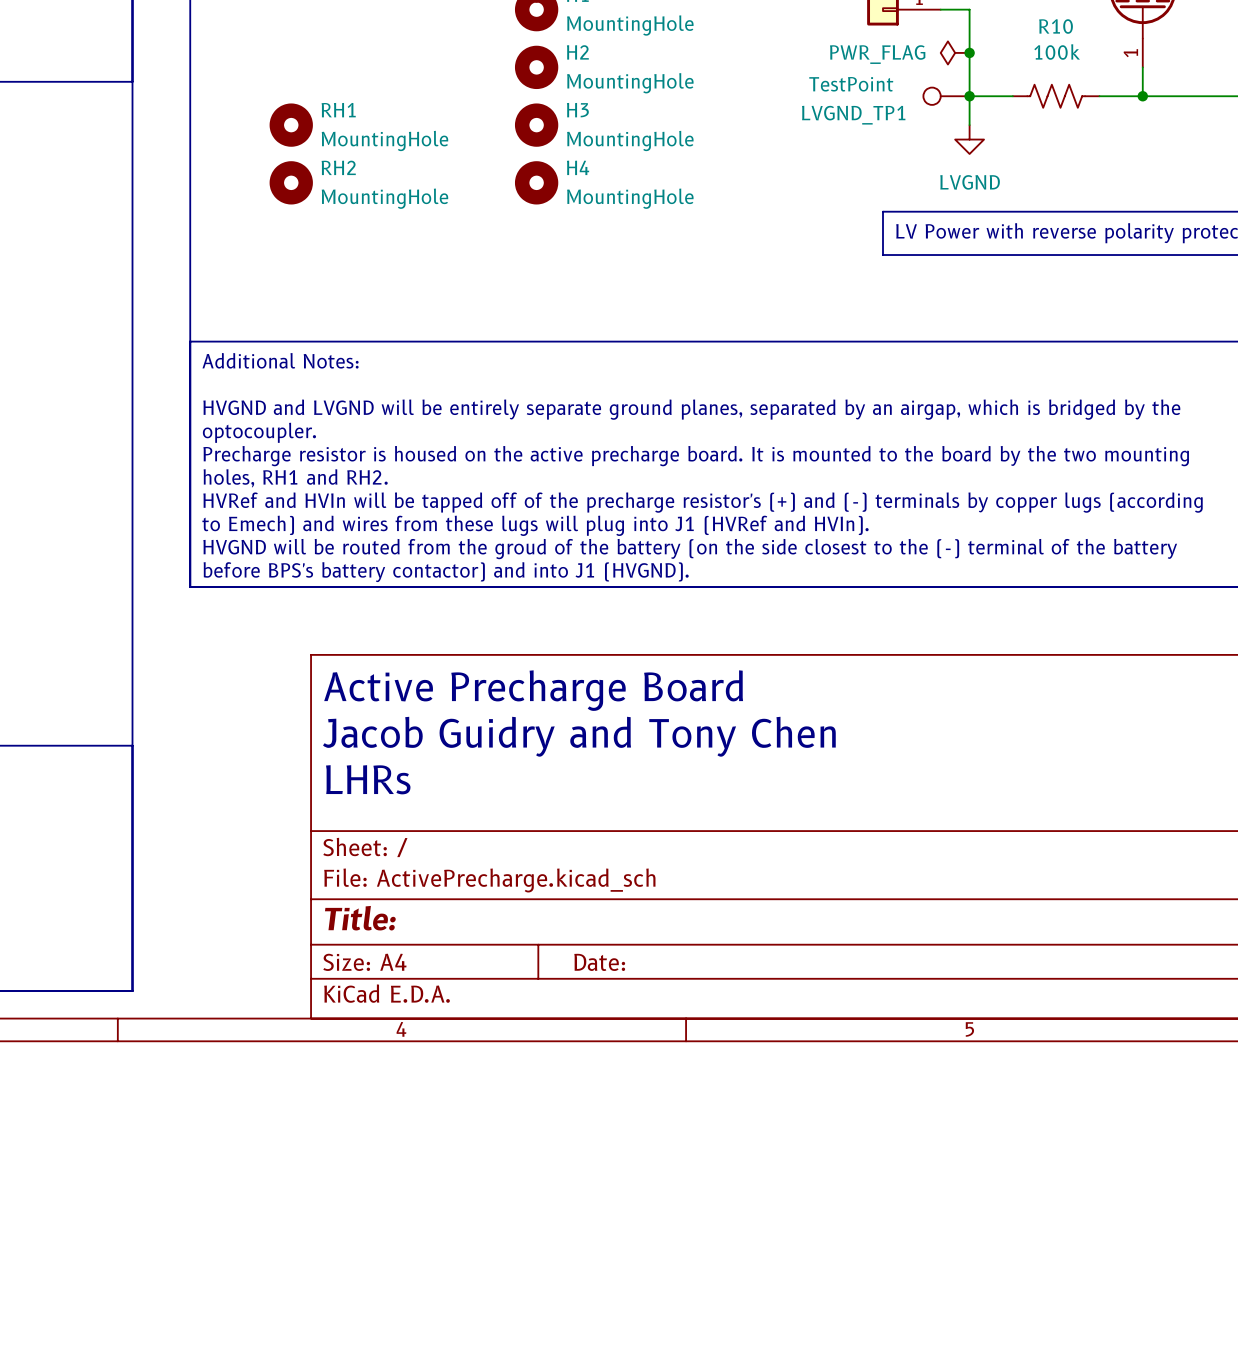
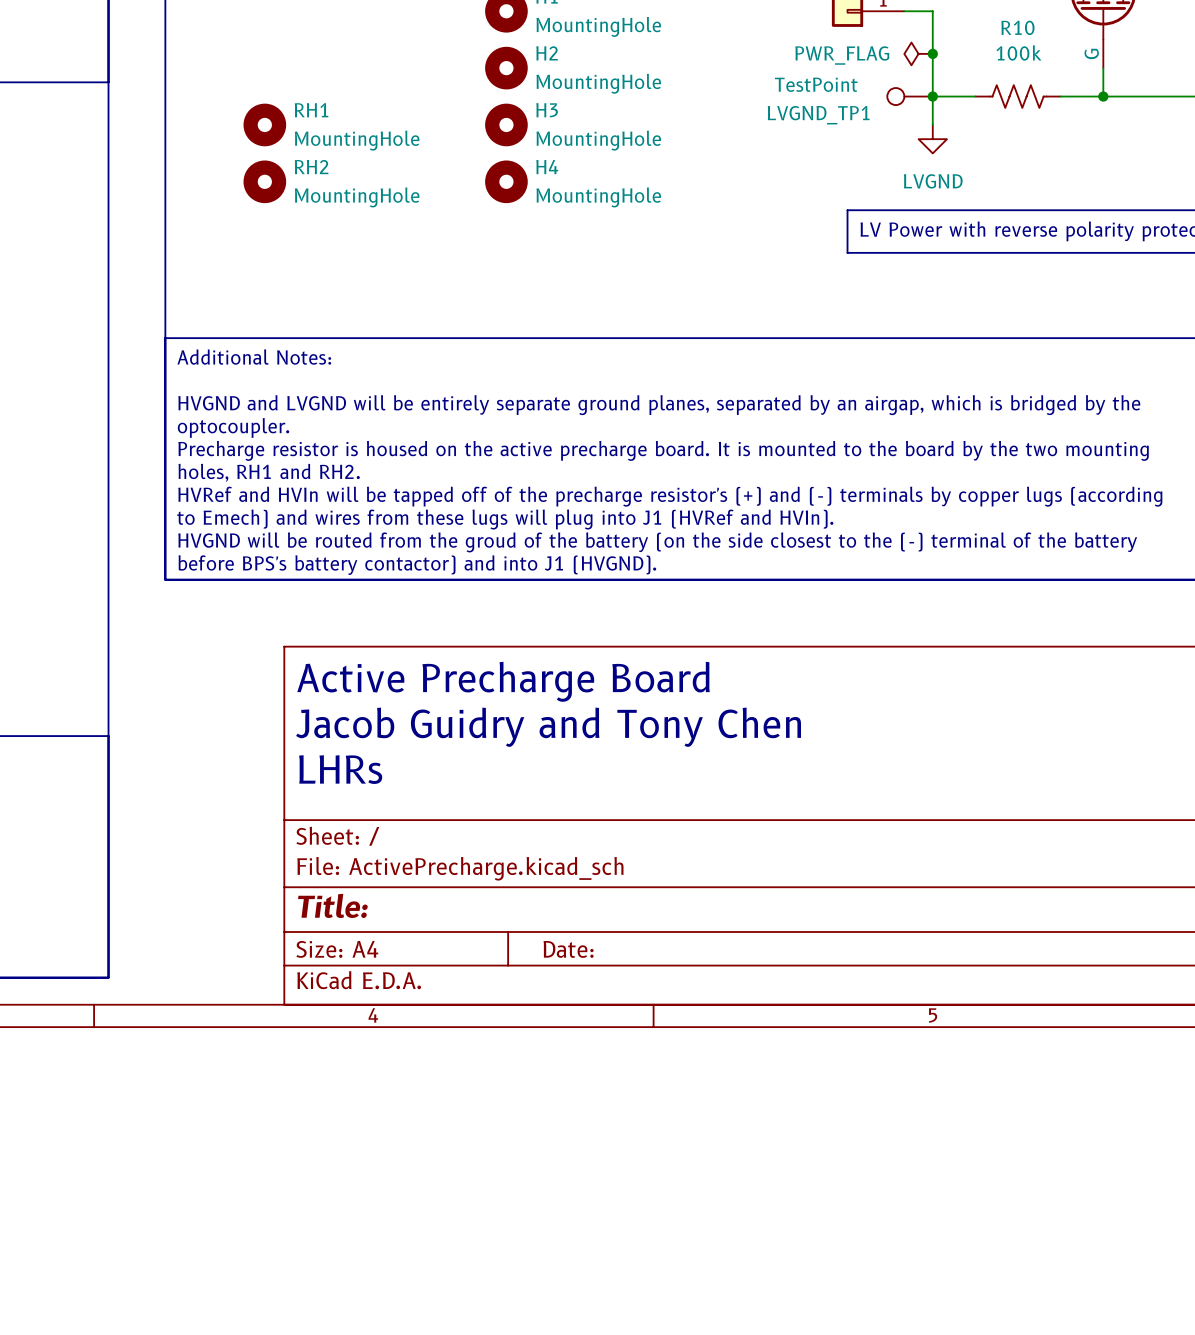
part pin name: none -> G (1091, 53)
part pin number: 1 (1130, 53) -> none

